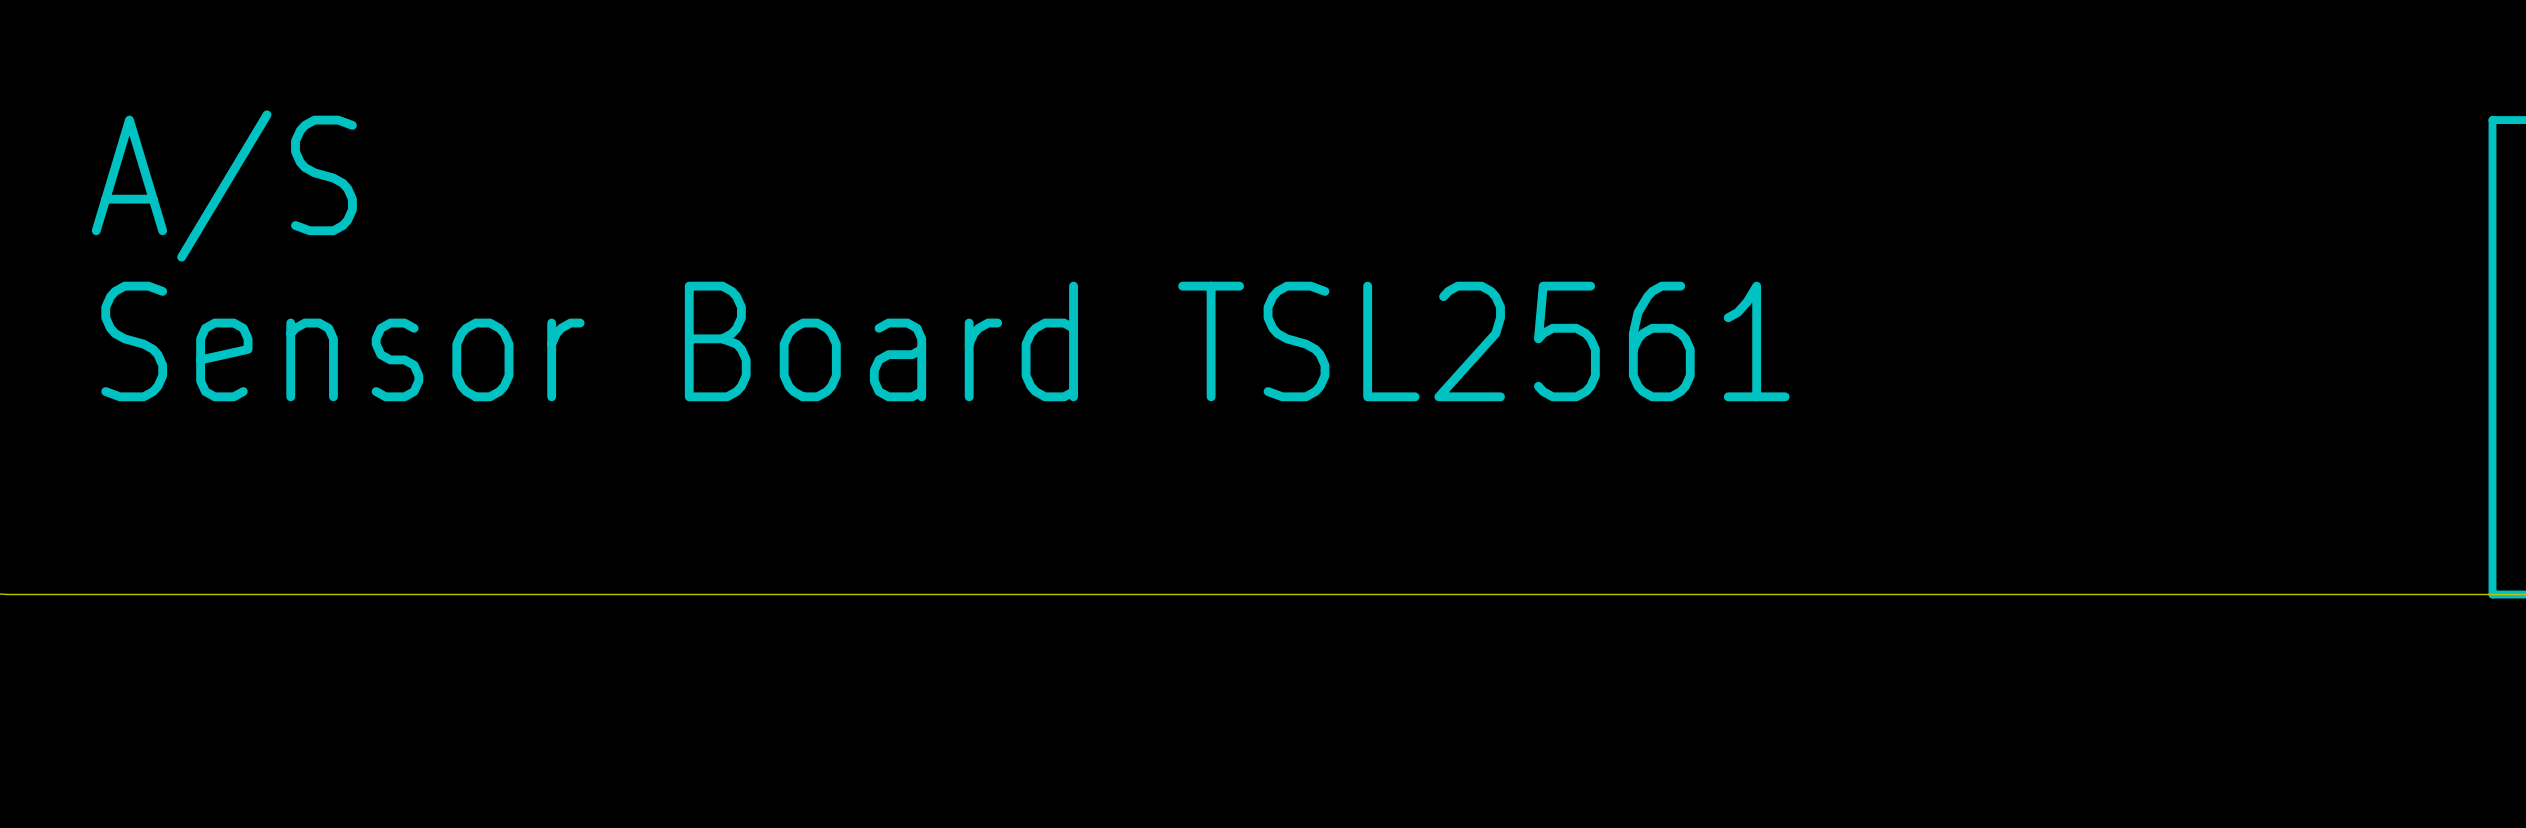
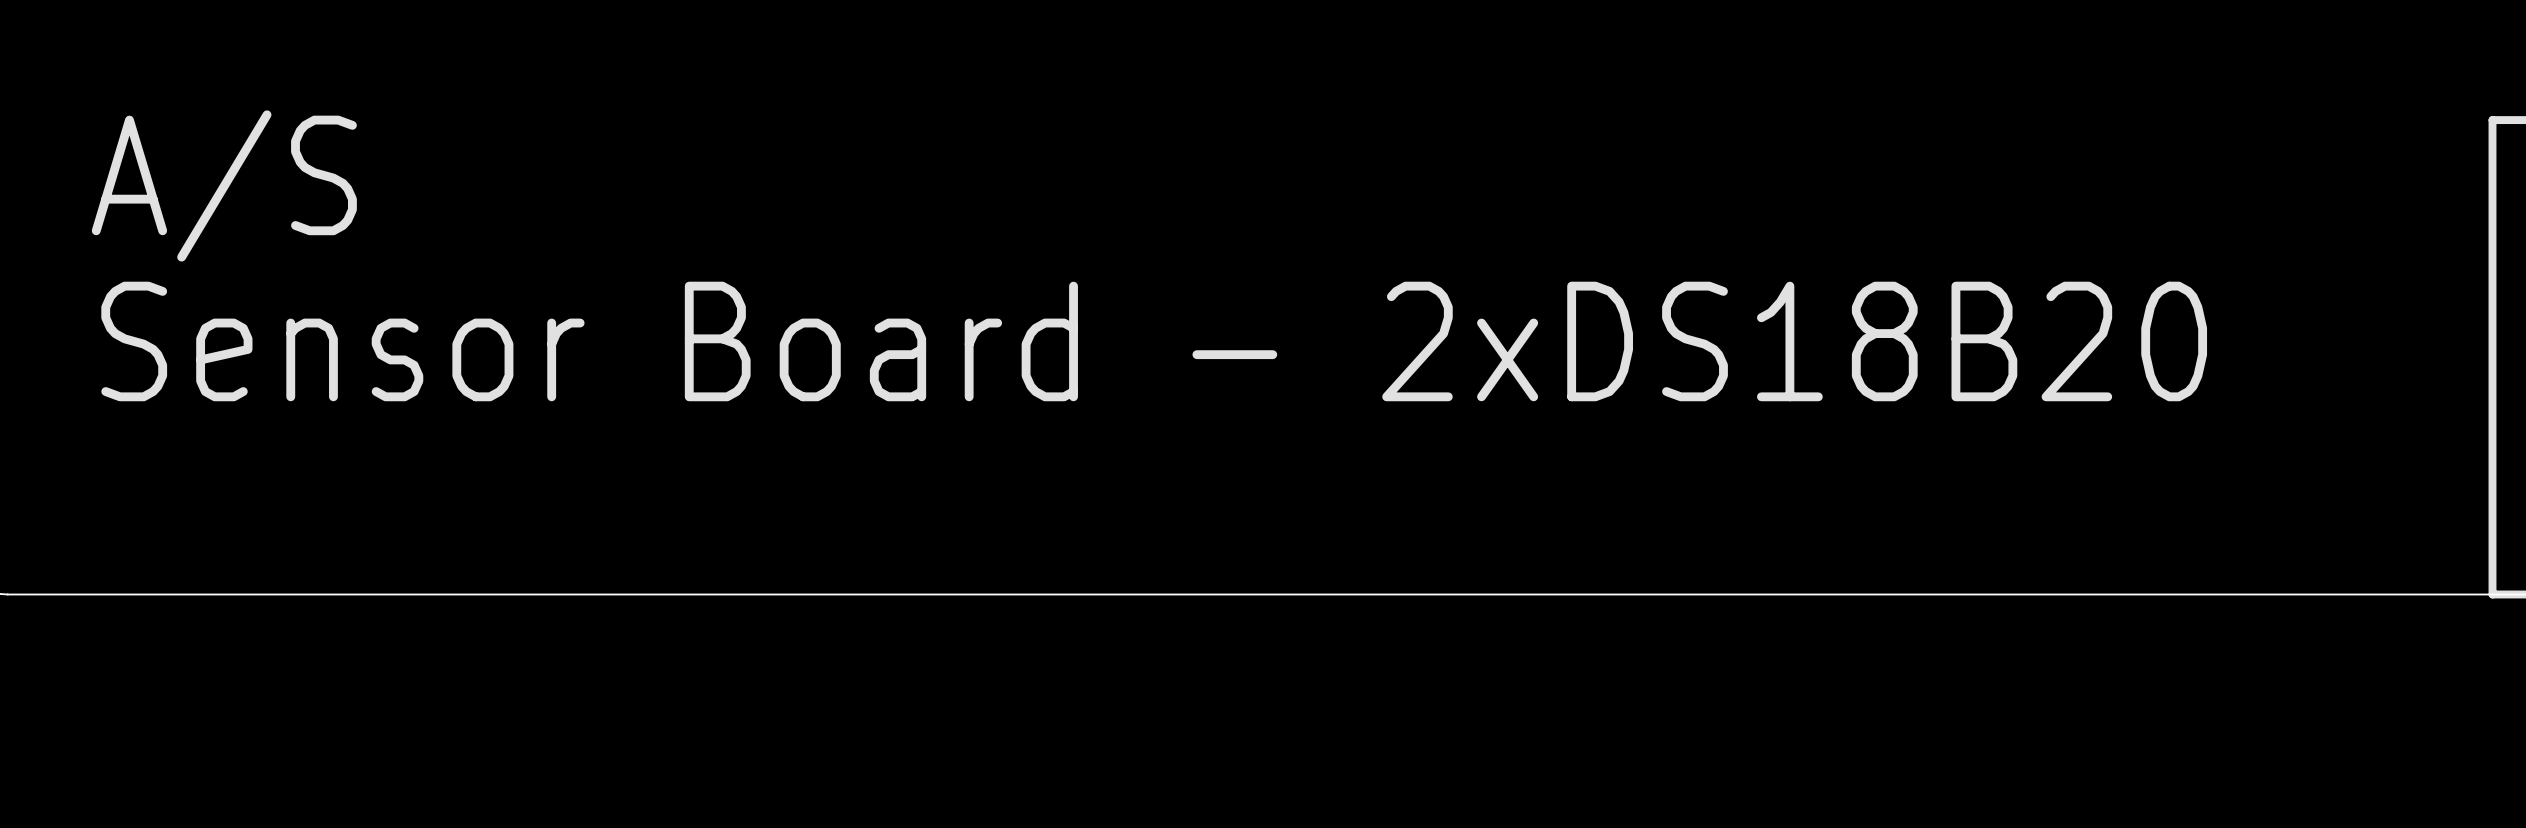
text: Sensor Board TSL2561 (945, 341) -> Sensor Board - 2xDS18B20 (1154, 341)

